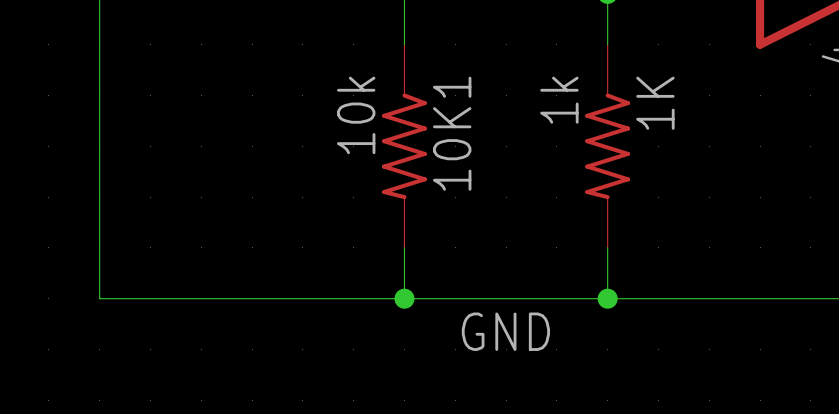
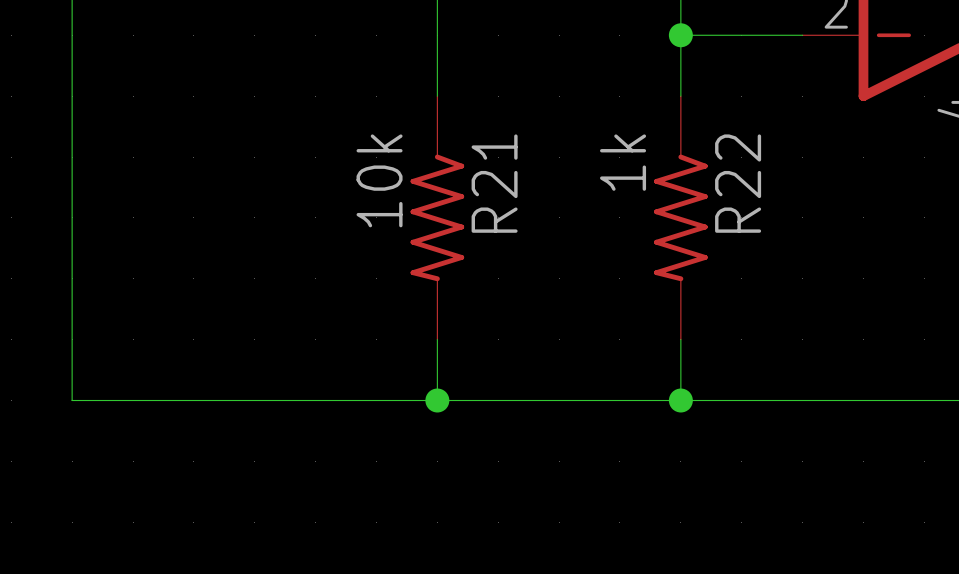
1K name: 1K (655, 103) -> R22 (738, 183)
10K1 name: 10K1 (452, 133) -> R21 (494, 183)
label: GND (505, 331) -> none

